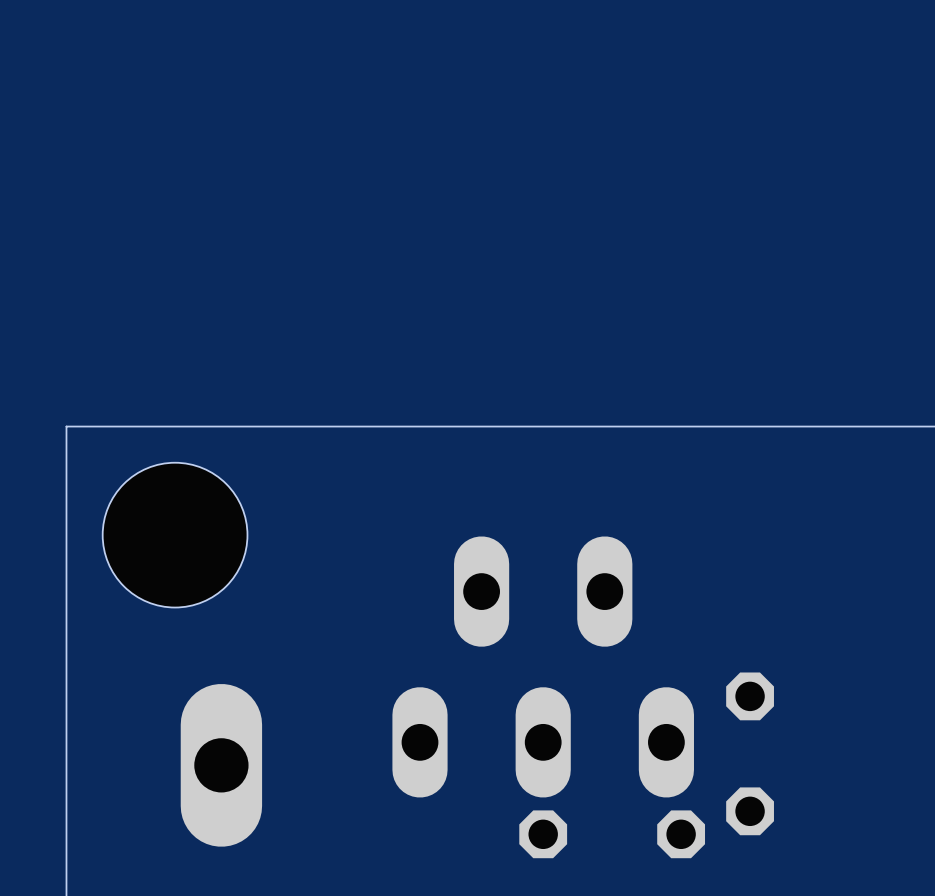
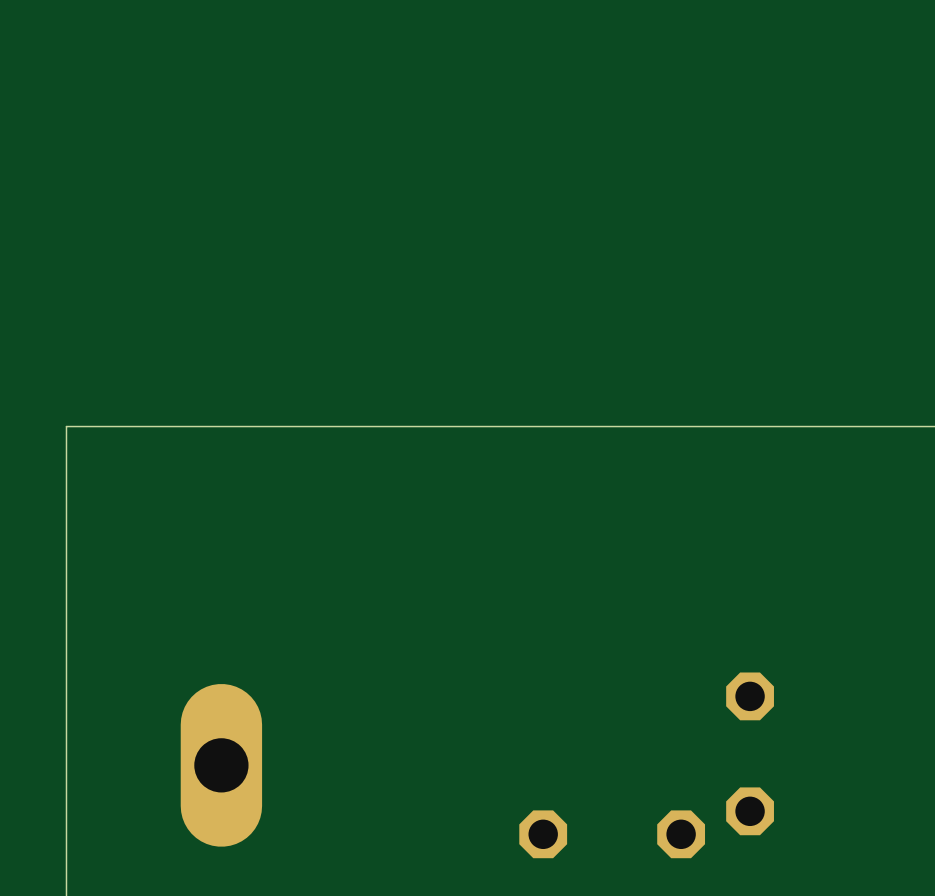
hole: (175, 535) -> none
part: (543, 666) -> none

